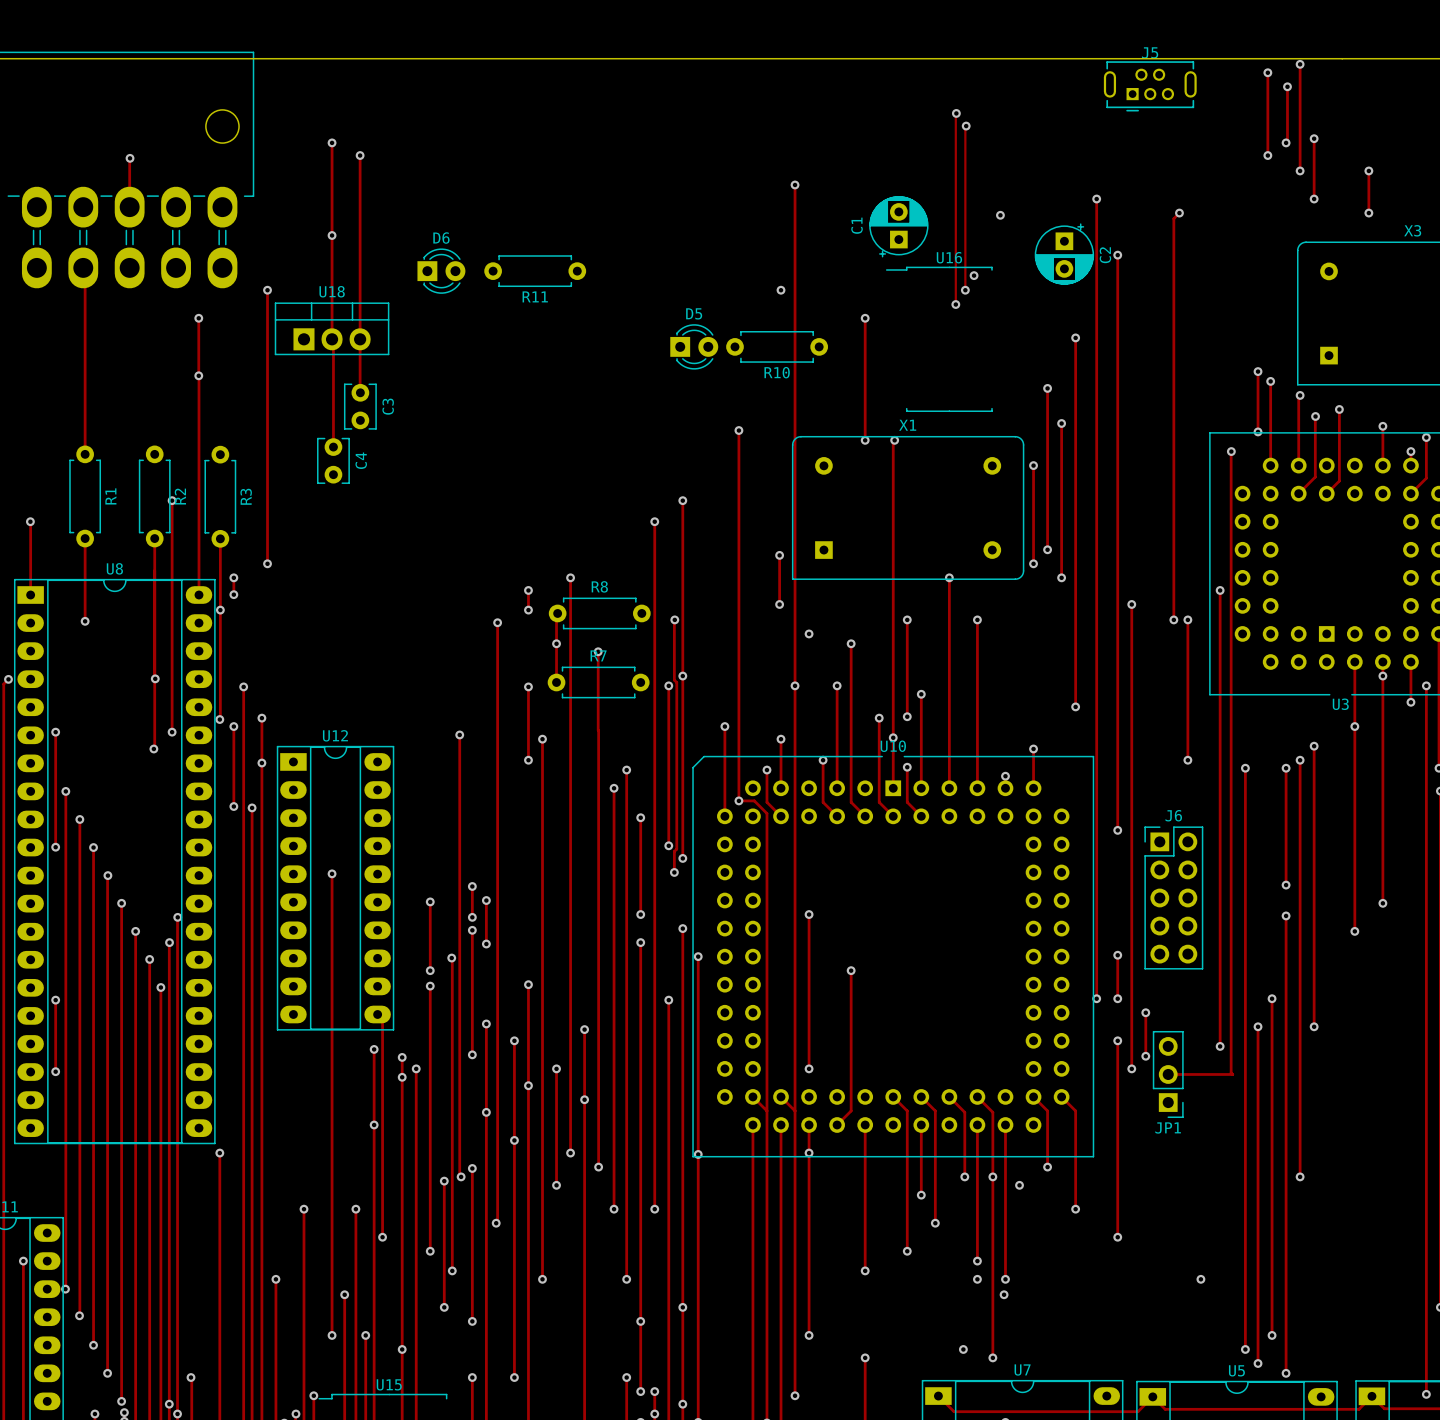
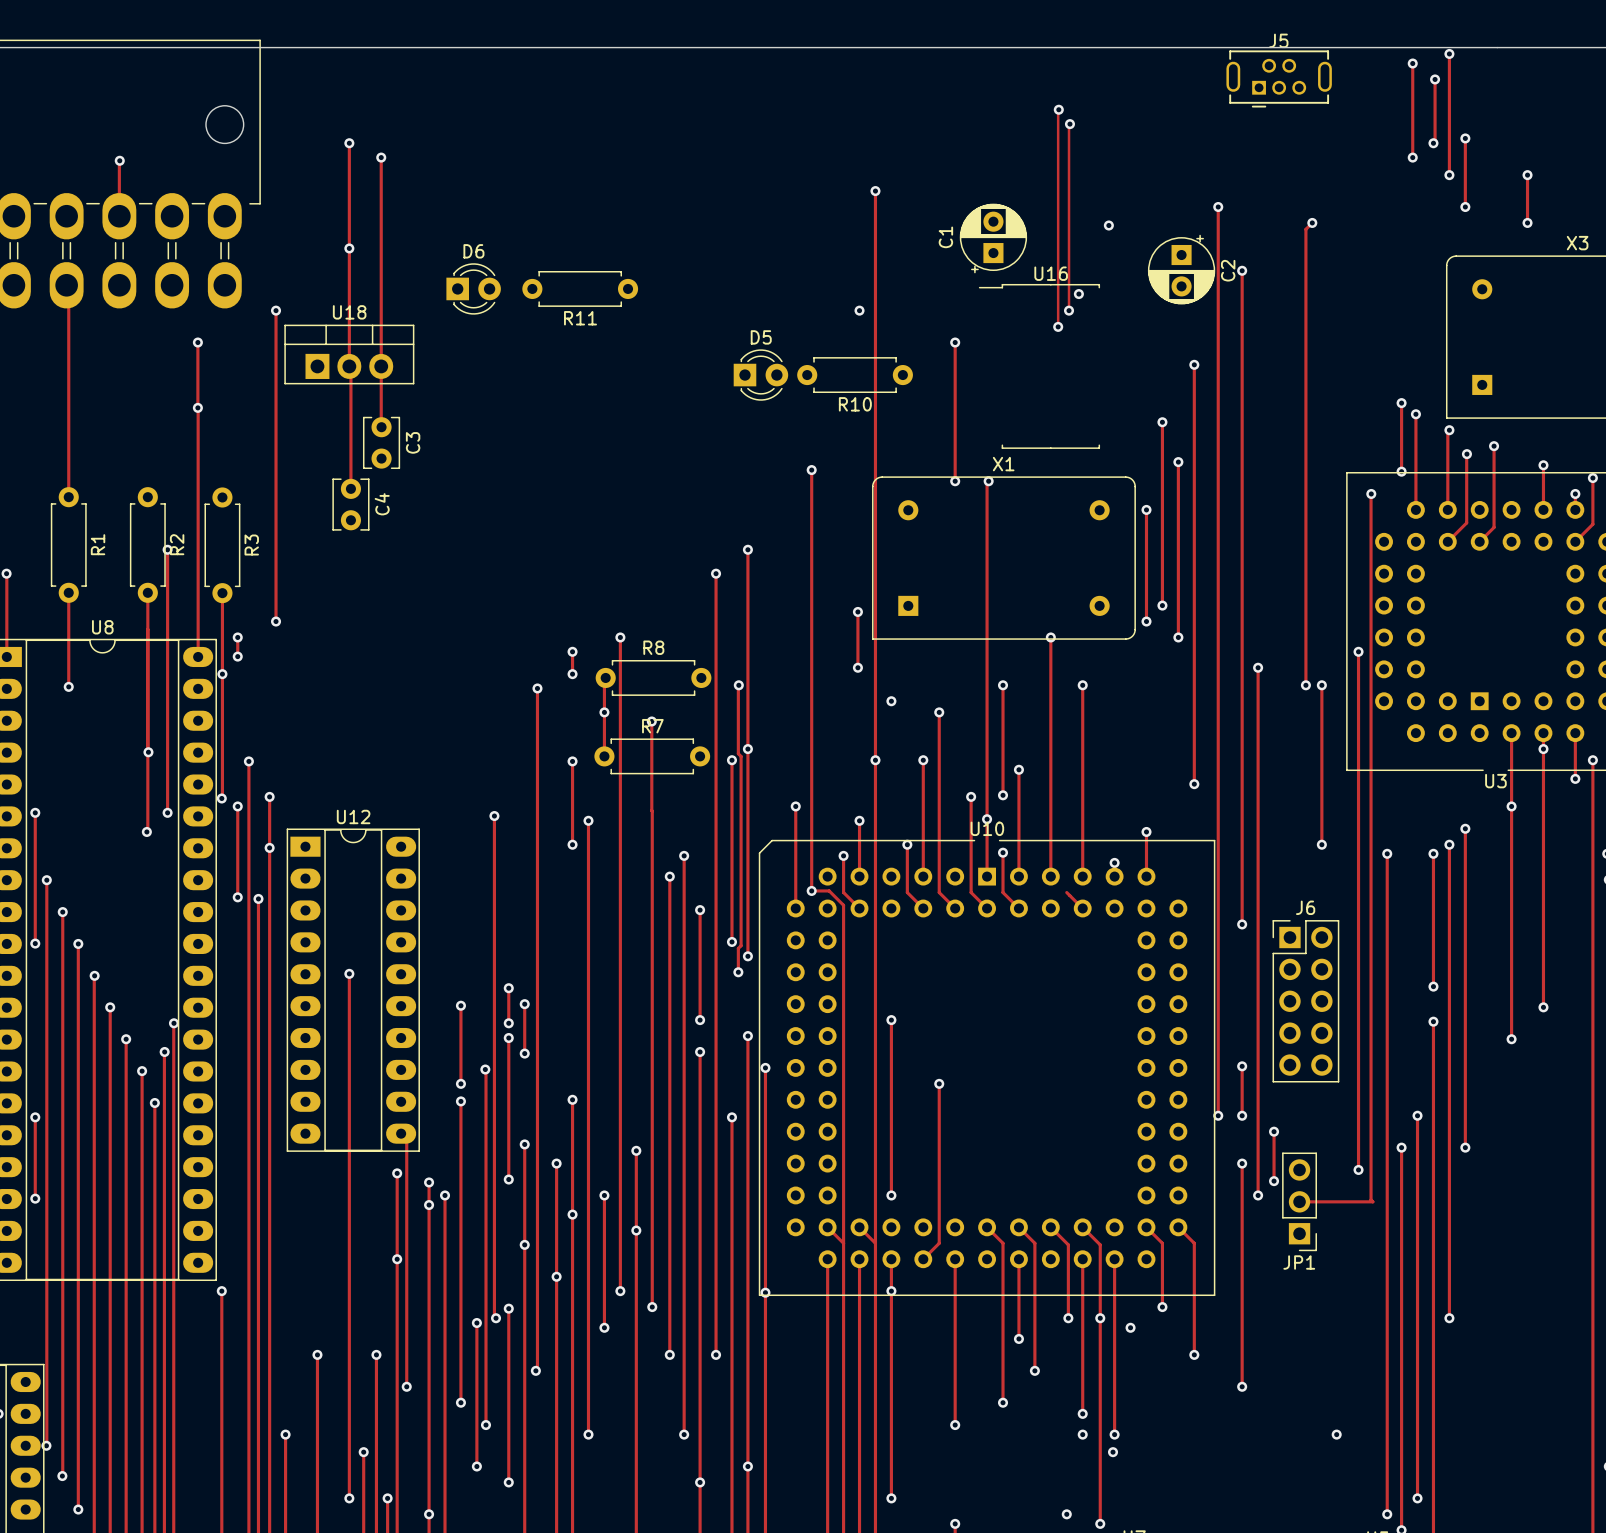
track: none -> (1066, 892) (1082, 908)

